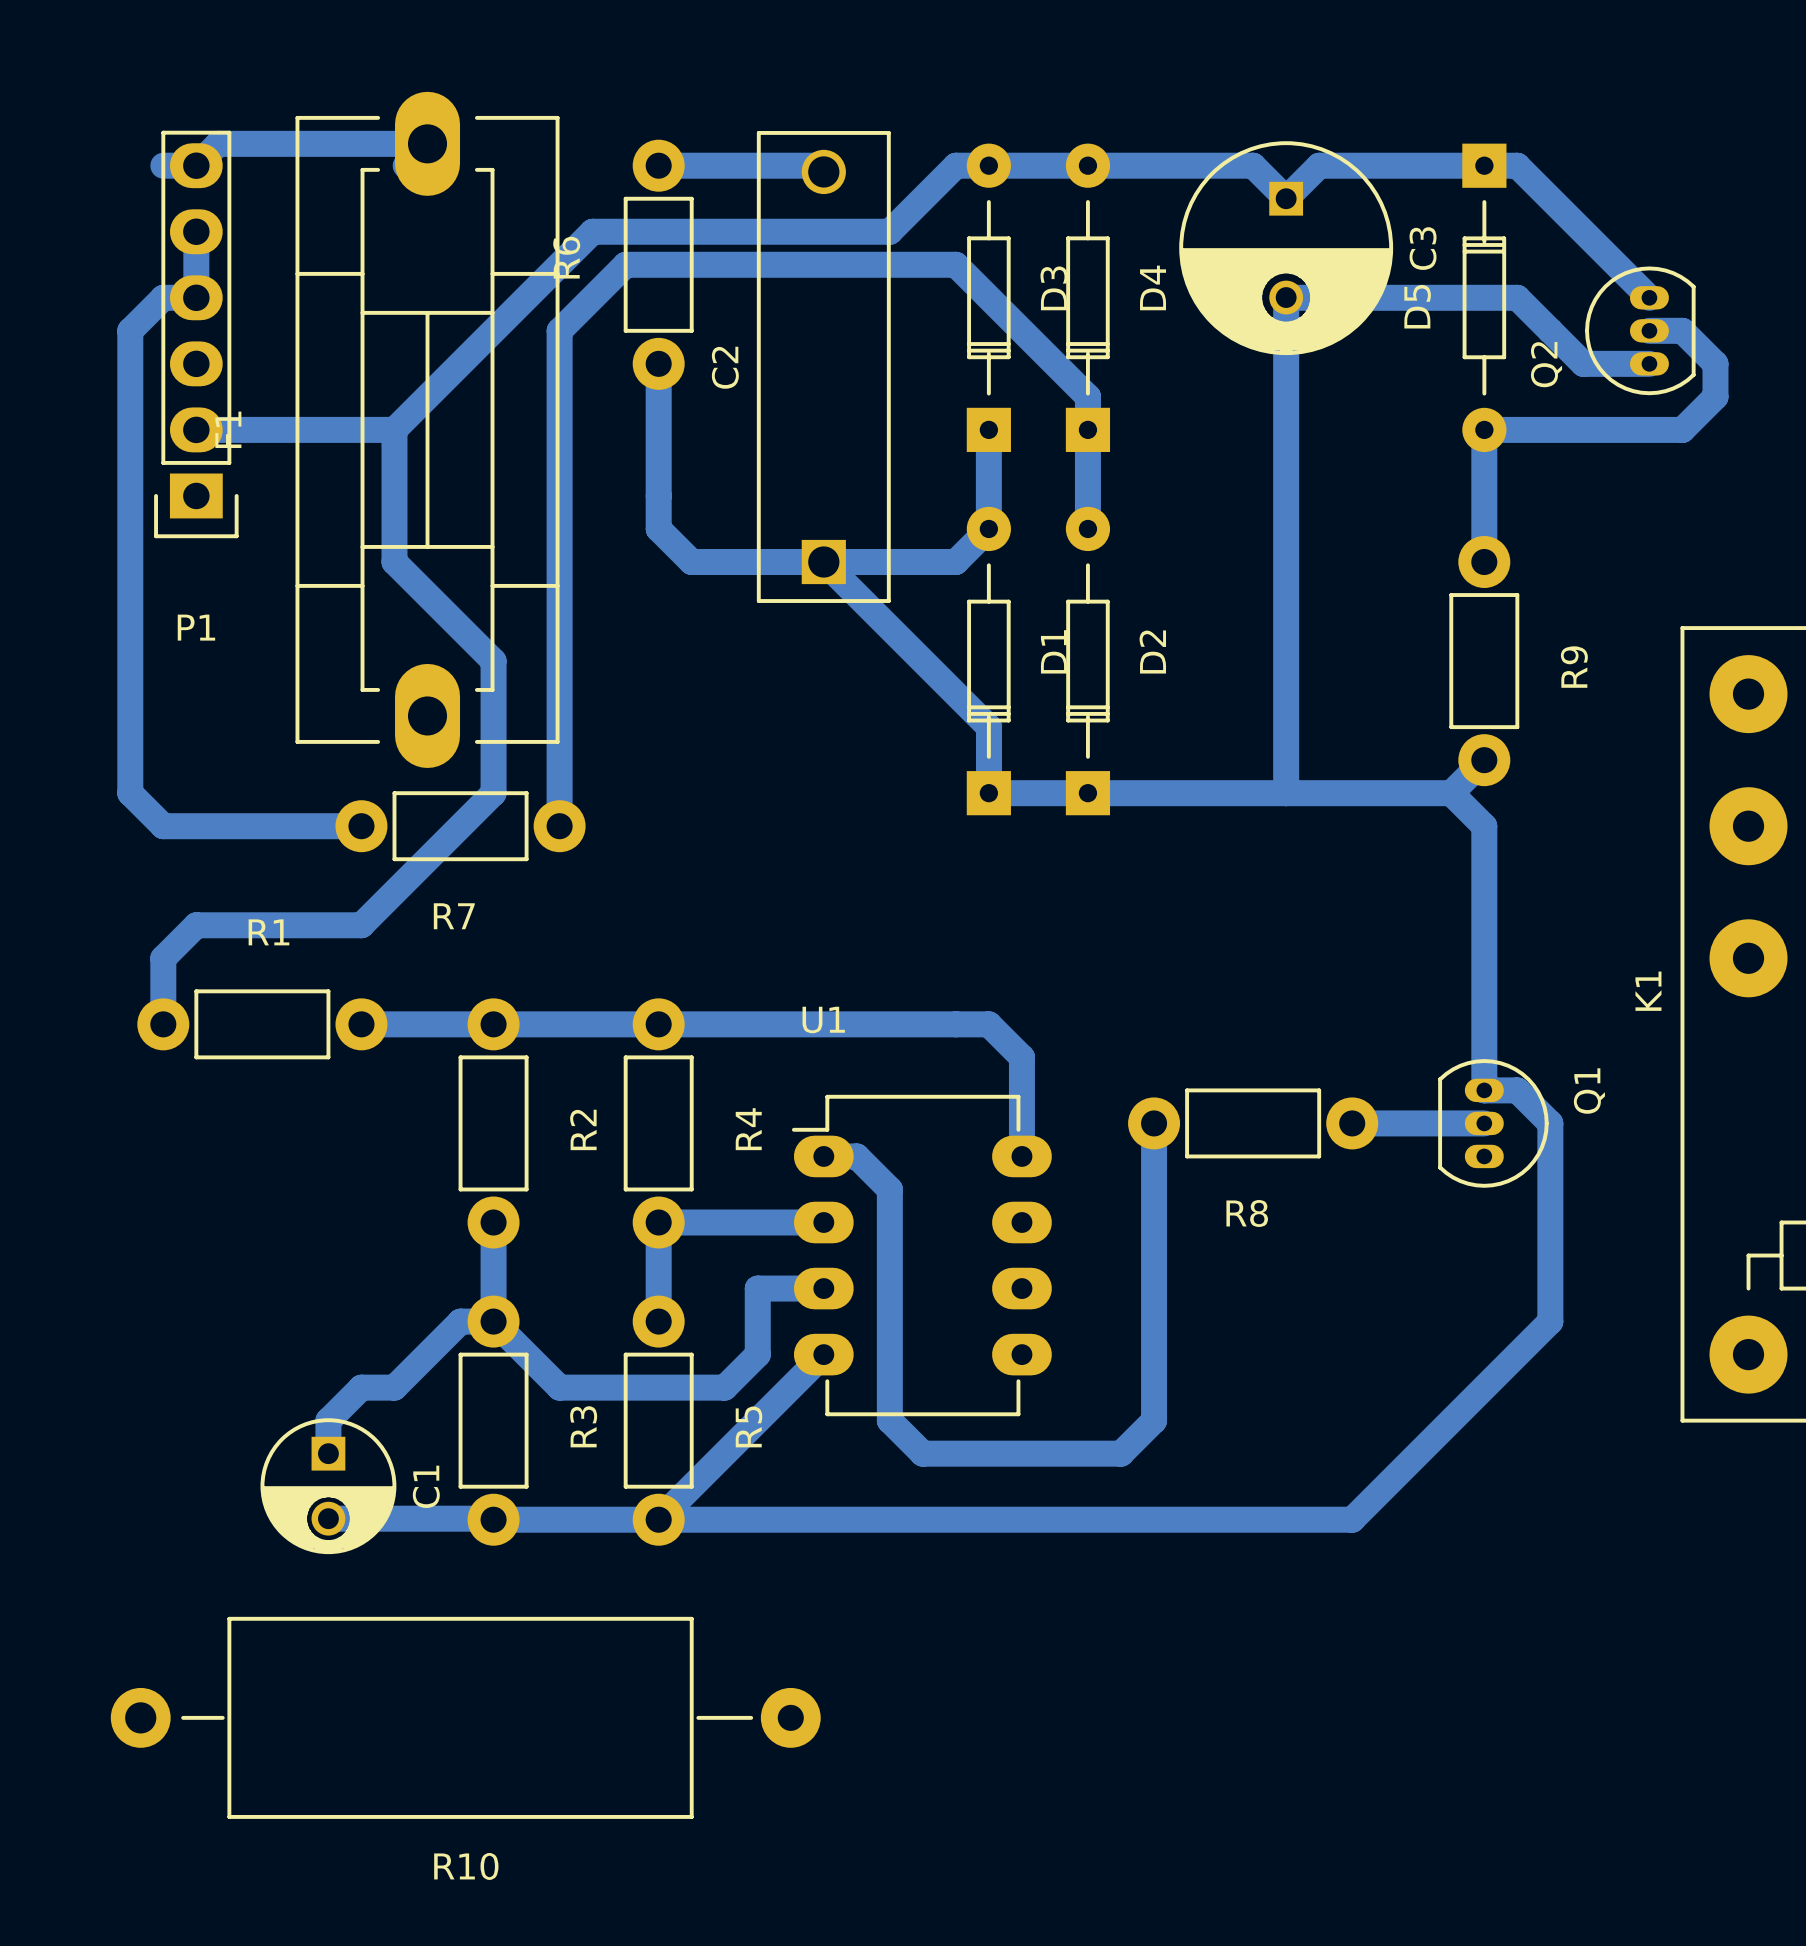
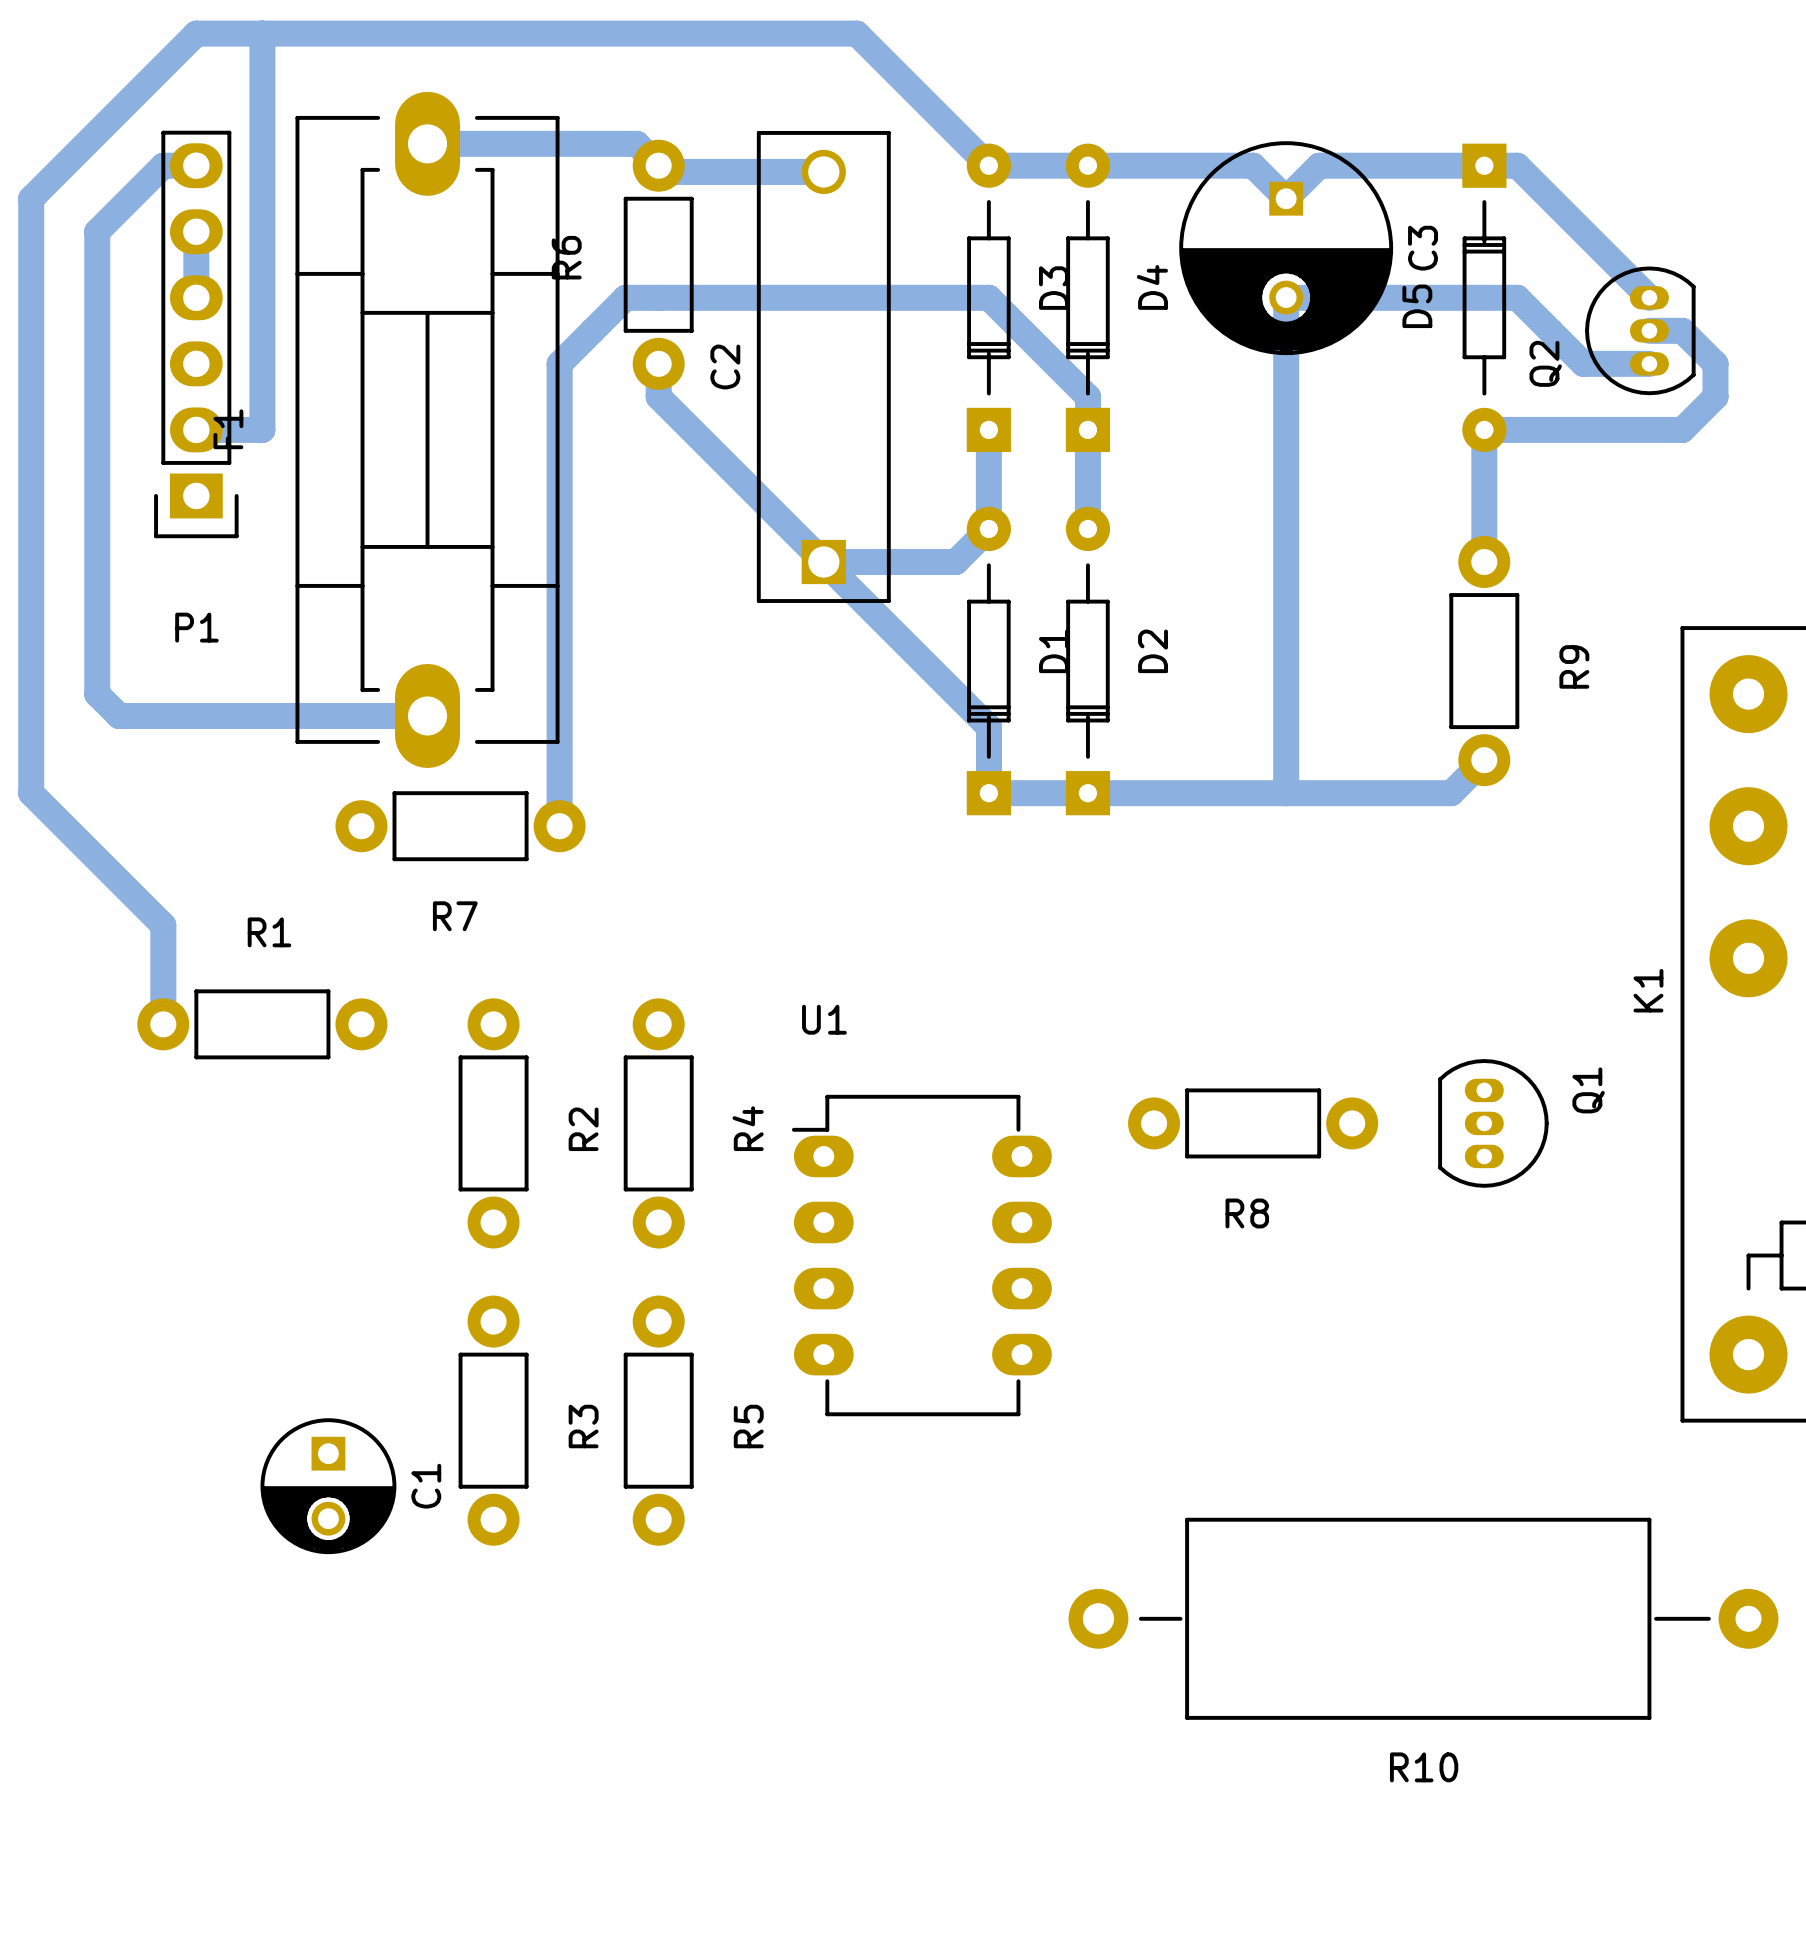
bottom track: none -> (163, 165) (97, 231) (97, 694) (119, 715) (427, 715)
bottom track: (196, 165) (218, 143) (427, 143) (405, 165) -> none
bottom track: (658, 165) (817, 165) (823, 171) -> (427, 143) (636, 143) (664, 171) (823, 171)
bottom track: (988, 165) (955, 165) (889, 231) (592, 231) (394, 429) -> (988, 165) (856, 33) (196, 33) (31, 198) (31, 793) (163, 925) (163, 958)
bottom track: (196, 297) (163, 297) (130, 330) (130, 793) (163, 826) (361, 826) -> none
bottom track: (988, 297) (955, 264) (625, 264) (559, 330) (559, 363) -> (988, 297) (625, 297) (559, 363)
bottom track: (658, 396) (658, 528) (691, 562) (823, 562) -> (658, 396) (823, 562)
bottom track: (262, 429) (394, 429) -> (262, 429) (262, 33)
bottom track: (394, 429) (394, 562) (493, 661) (493, 793) (361, 925) (196, 925) (163, 958) -> none
bottom track: (1451, 793) (1484, 826) (1484, 1090) (1517, 1090) (1550, 1123) (1550, 1321) (1352, 1519) (328, 1518) -> none
bottom track: (361, 1024) (988, 1024) (1021, 1057) (1021, 1156) -> none
bottom track: (1154, 1123) (1154, 1420) (1121, 1453) (922, 1453) (889, 1420) (889, 1189) (856, 1156) (823, 1156) -> none
bottom track: (1352, 1123) (1484, 1123) -> none
bottom track: (493, 1222) (493, 1321) -> none
bottom track: (823, 1222) (658, 1222) (658, 1321) -> none
bottom track: (823, 1288) (757, 1288) (757, 1354) (724, 1387) (559, 1387) (493, 1321) -> none
bottom track: (493, 1321) (460, 1321) (394, 1387) (361, 1387) (328, 1420) (328, 1453) -> none
bottom track: (823, 1354) (658, 1519) -> none
R10 position: (465, 1717) -> (1423, 1618)

